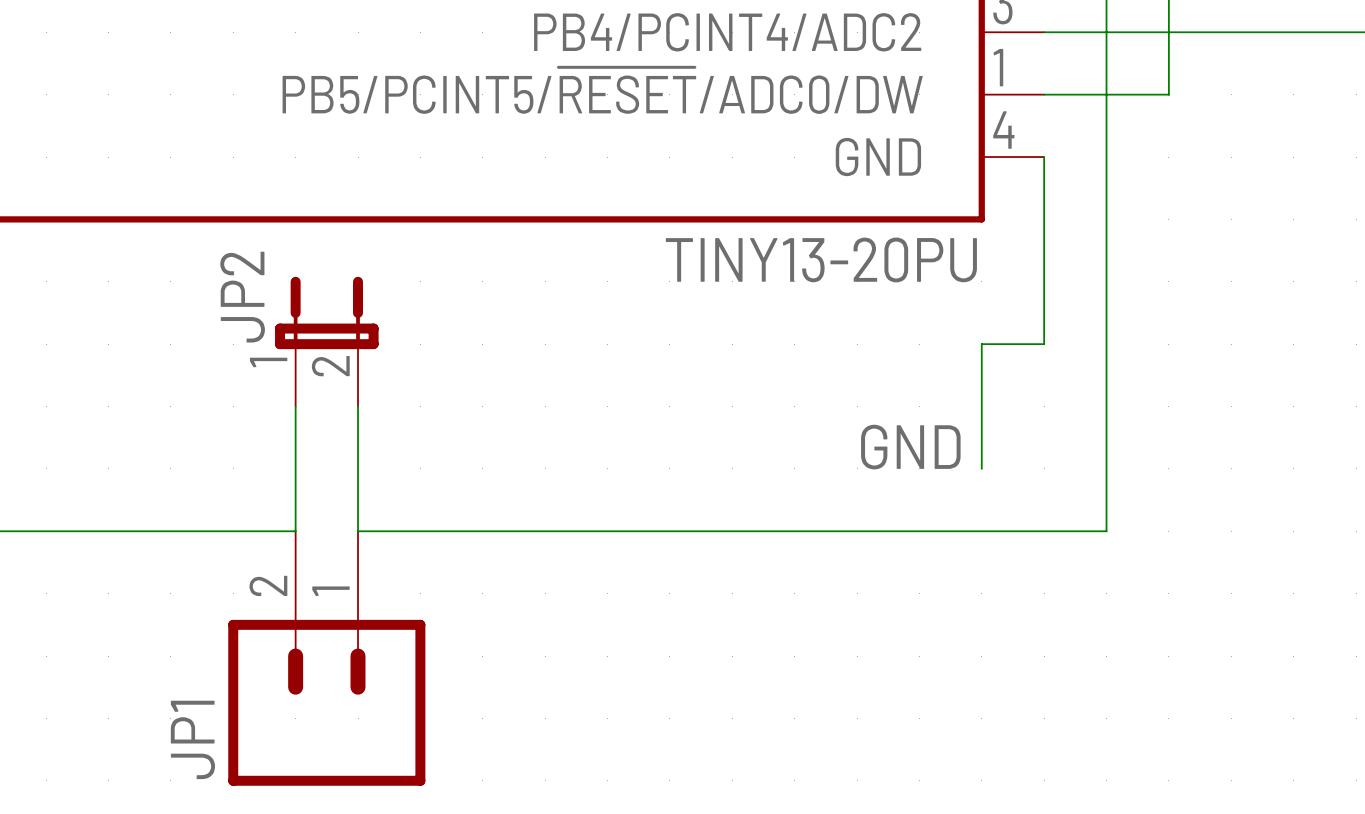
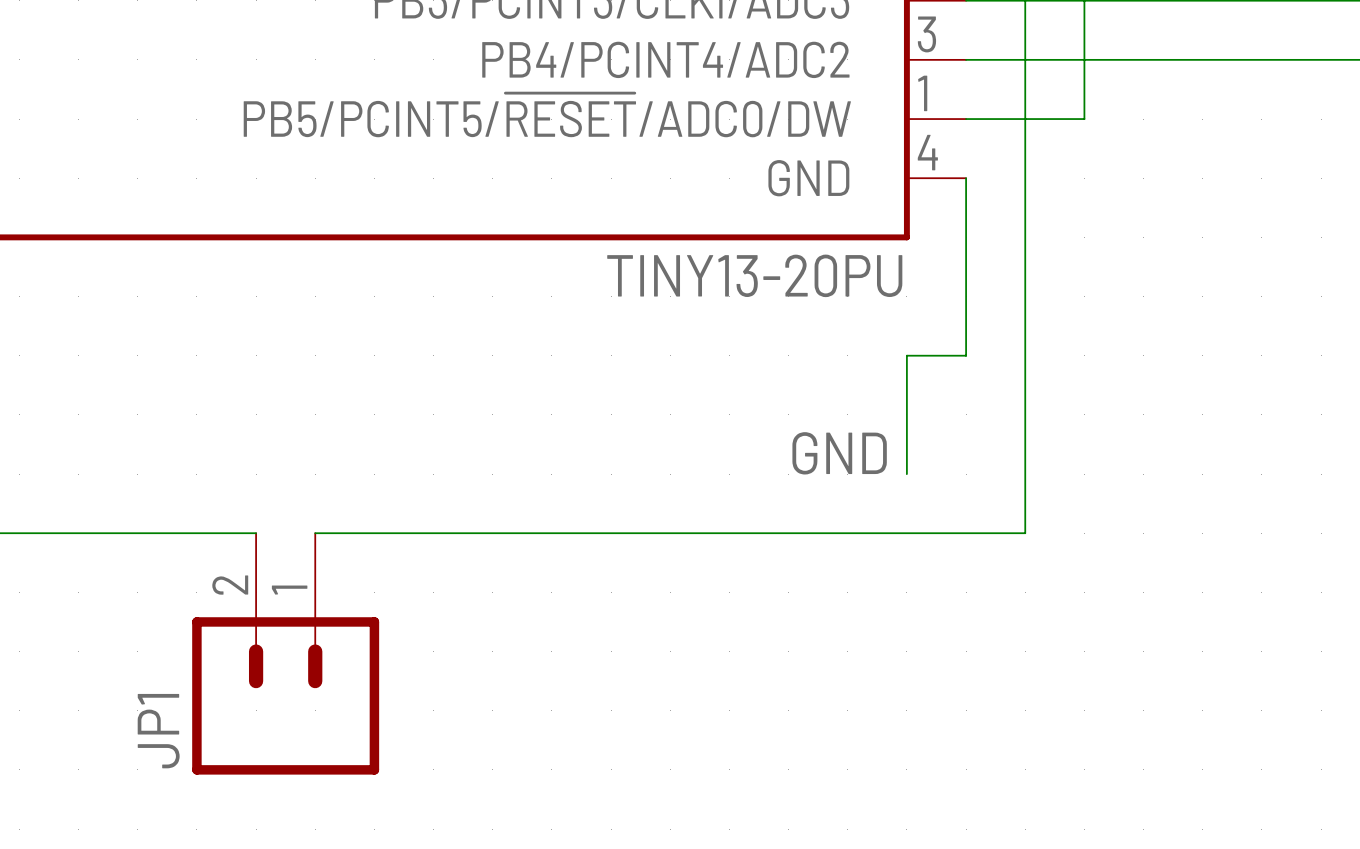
JP2: (326, 341) -> none
wire: (295, 406) (295, 531) -> none
wire: (358, 406) (358, 531) -> none

